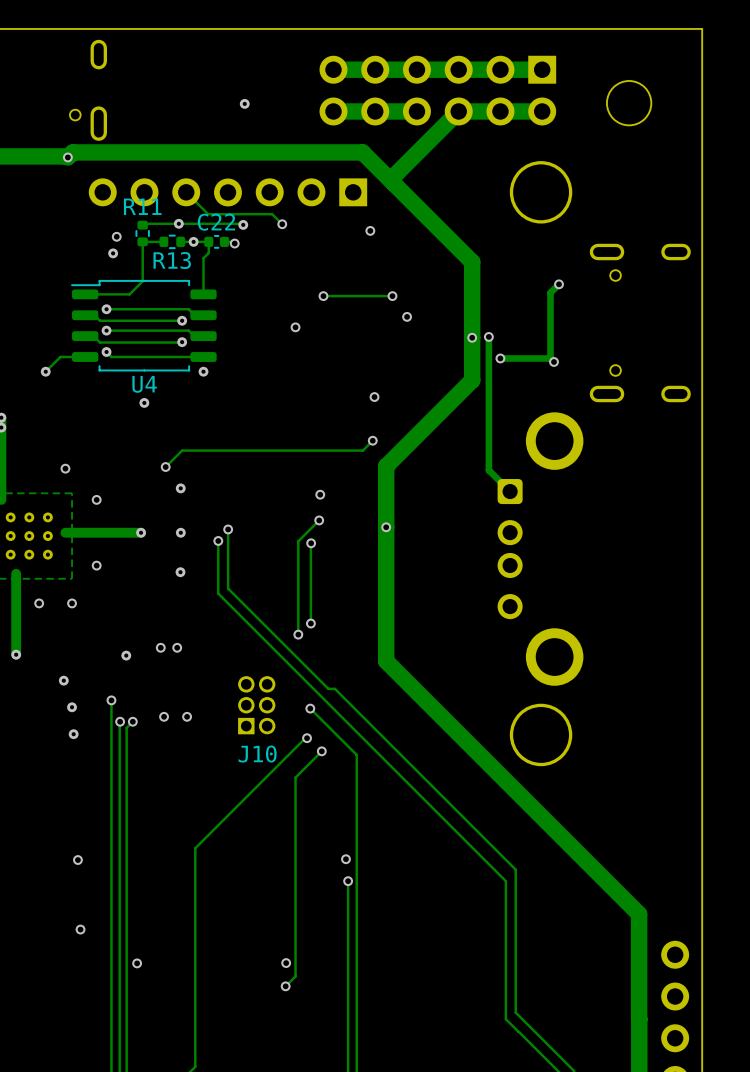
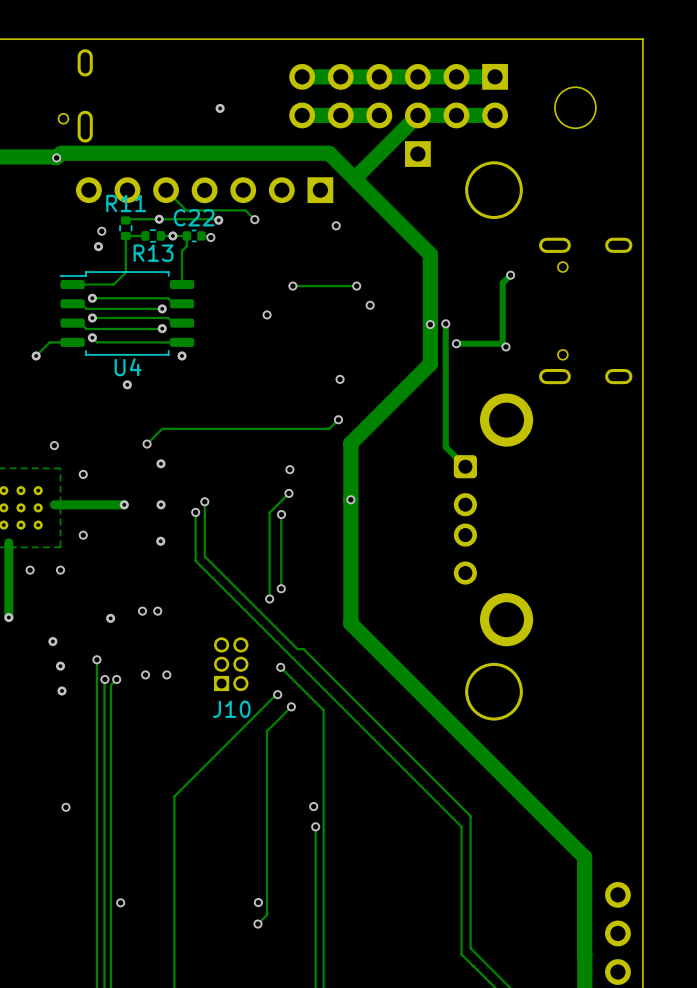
part: none -> (417, 154)
via: (80, 929) -> none

